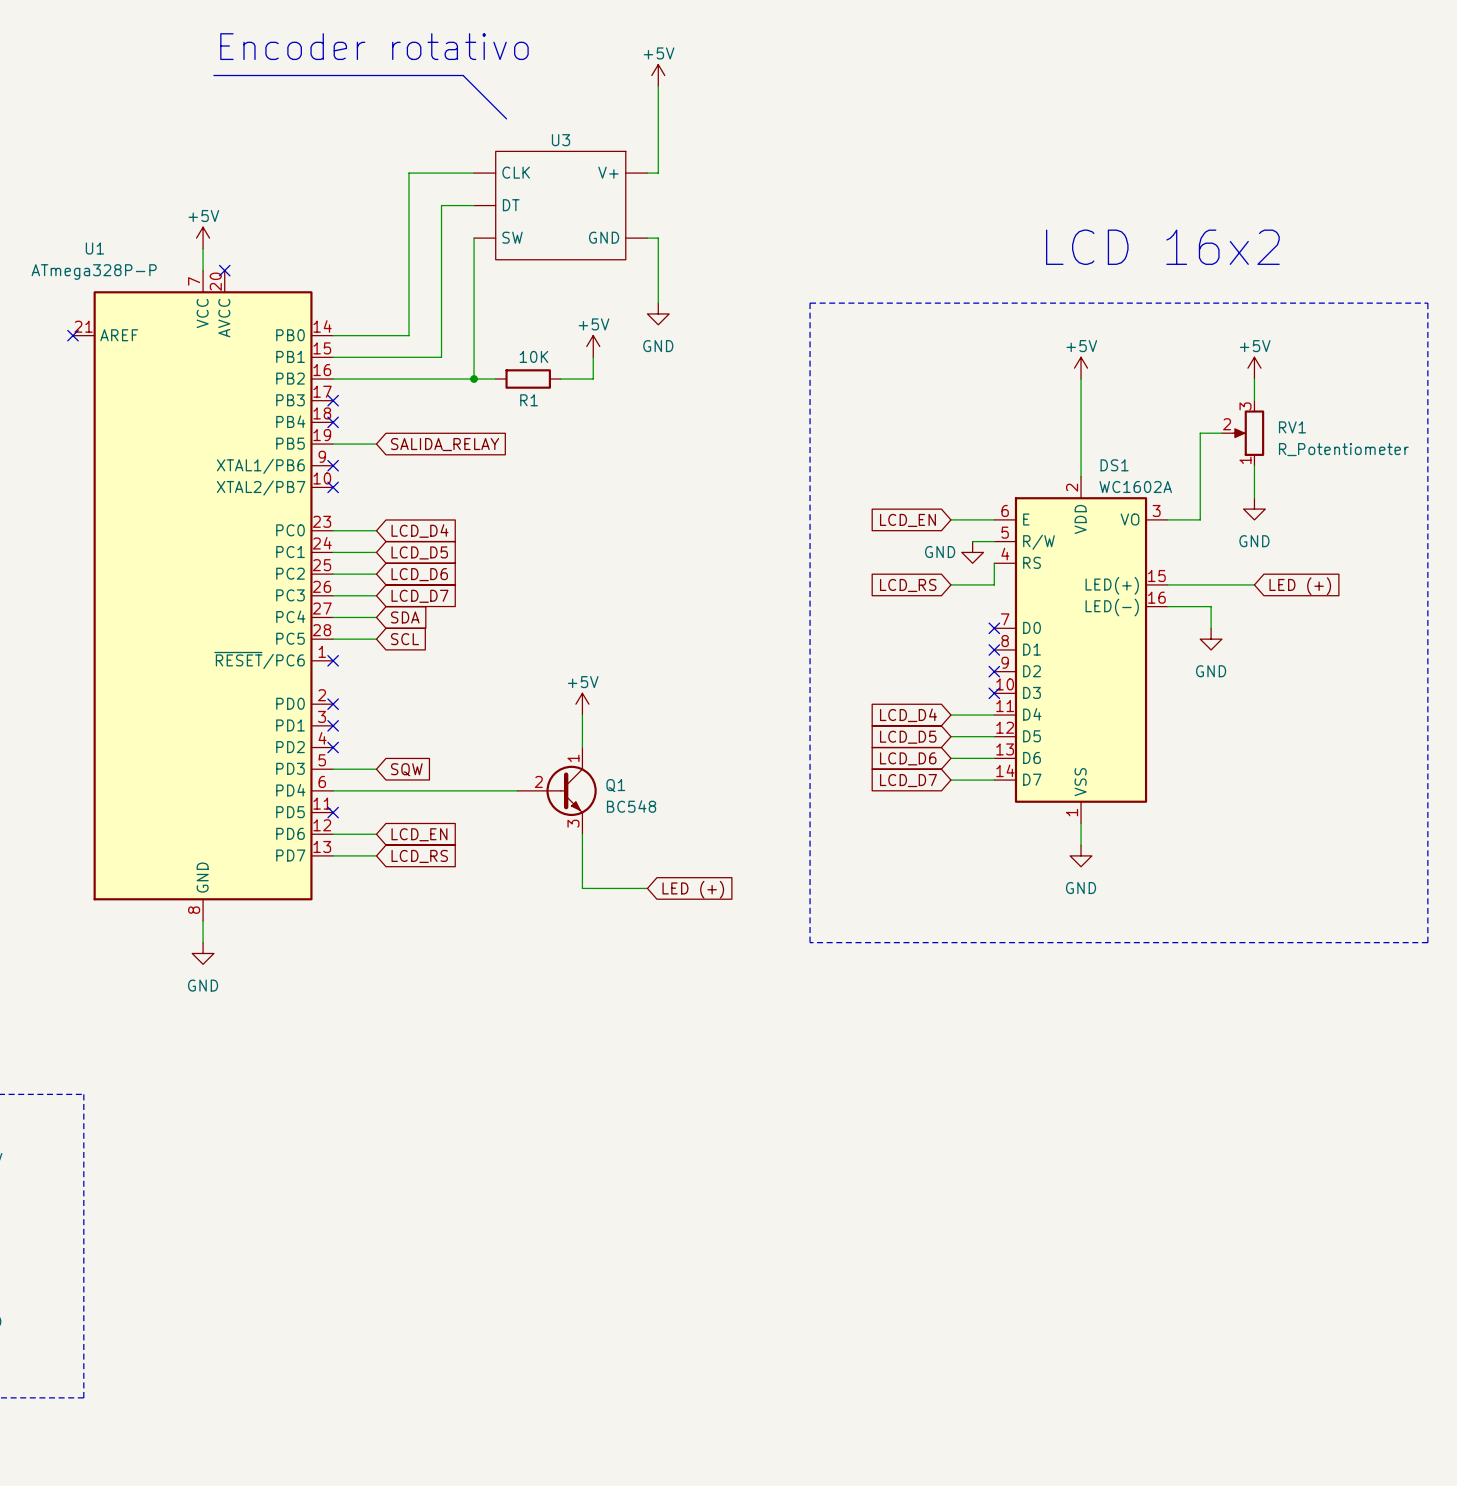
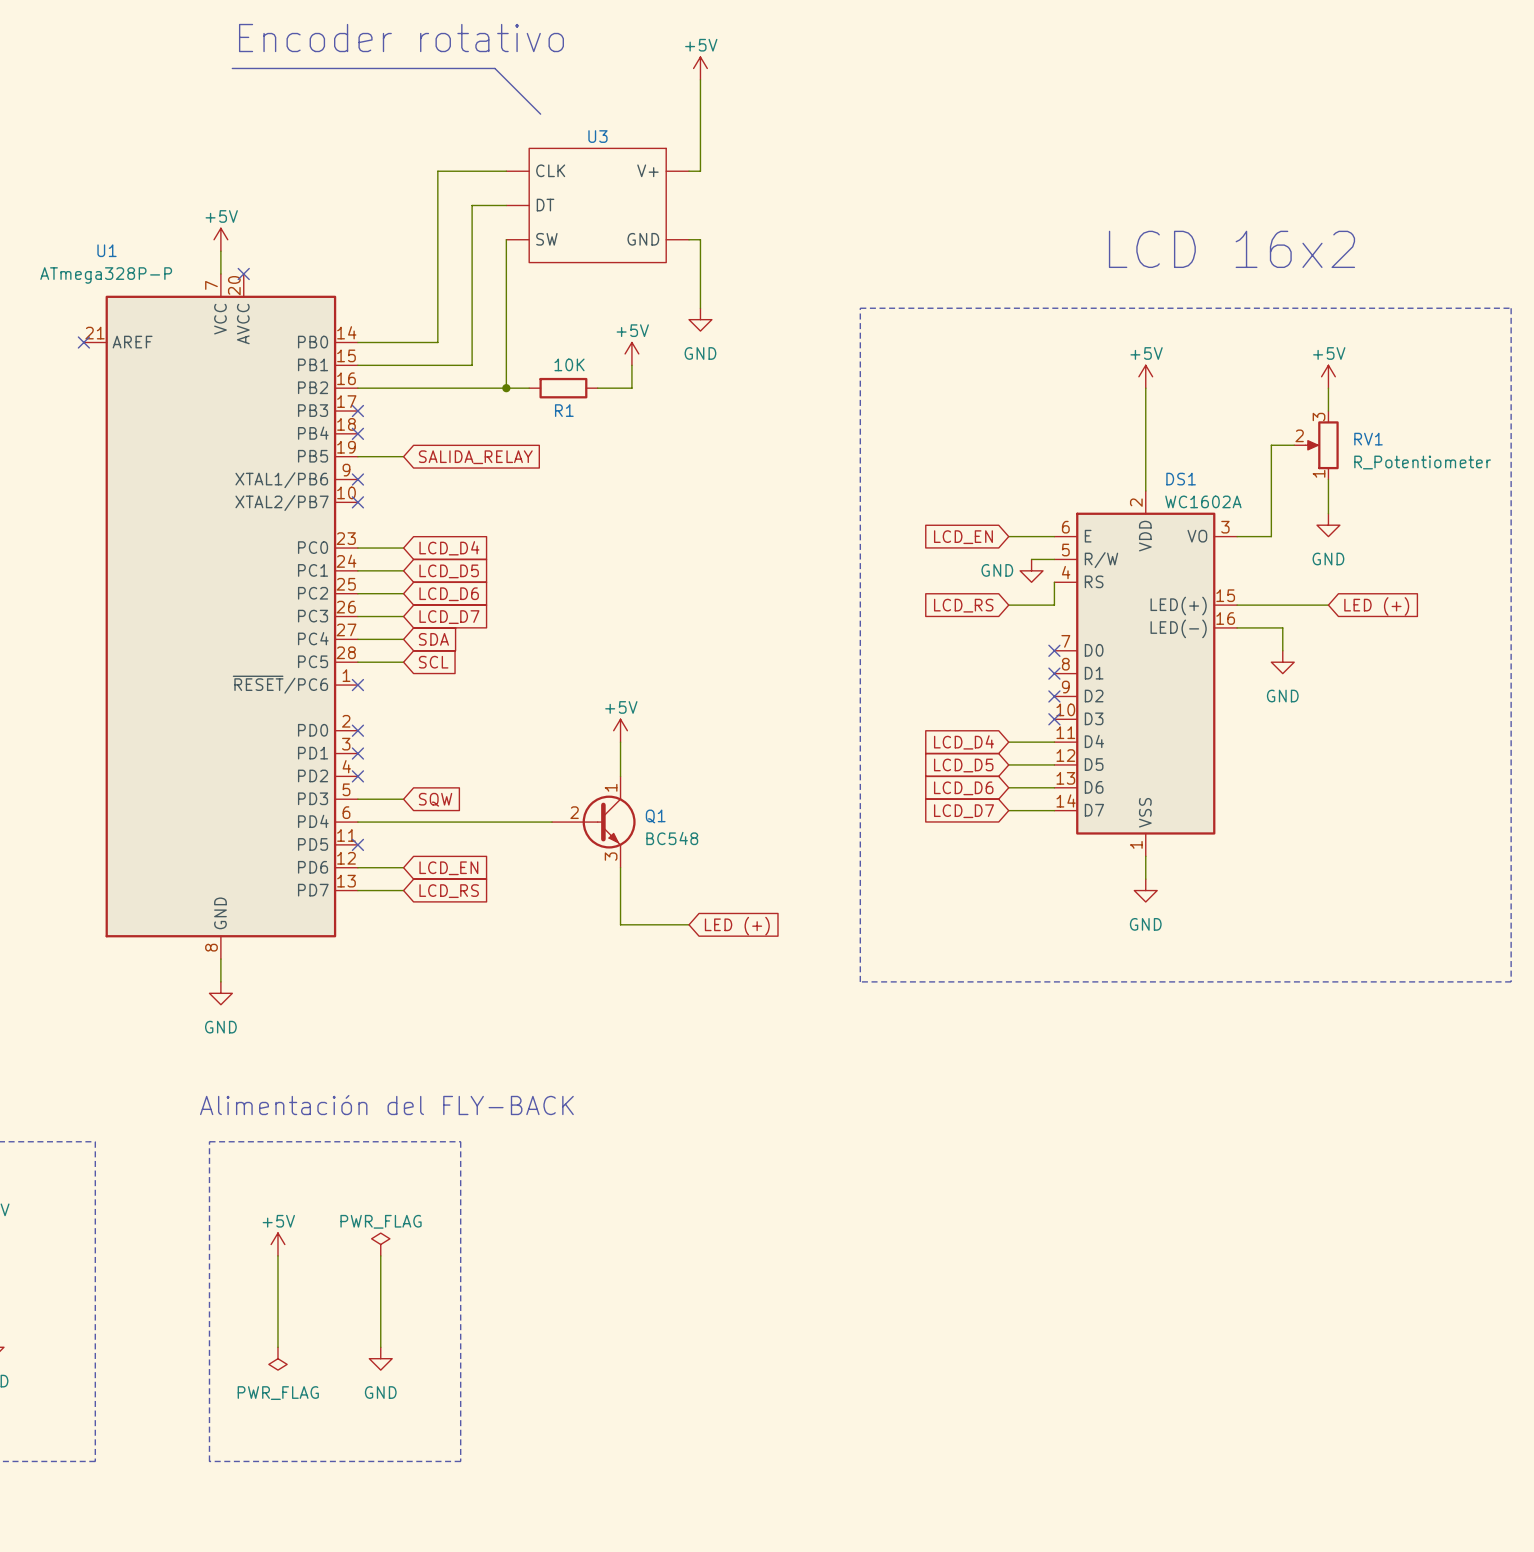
text: none -> Alimentación del FLY-BACK (386, 1105)
line: none -> (209, 1141) (460, 1141) (460, 1461) (209, 1461) (209, 1141)
power symbol: none -> +5V (277, 1244)
power symbol: none -> PWR_FLAG (380, 1244)
wire: none -> (277, 1255) (277, 1347)
wire: none -> (380, 1255) (380, 1347)
power symbol: none -> PWR_FLAG (277, 1358)
power symbol: none -> GND (380, 1358)

